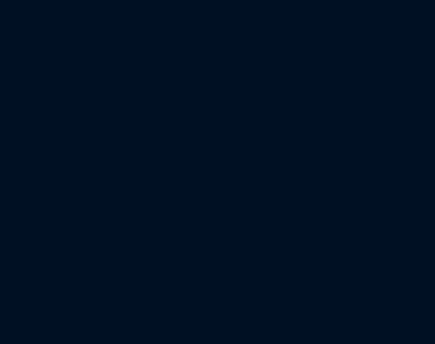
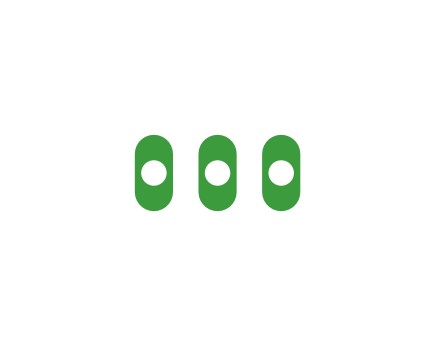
part: none -> (217, 173)

